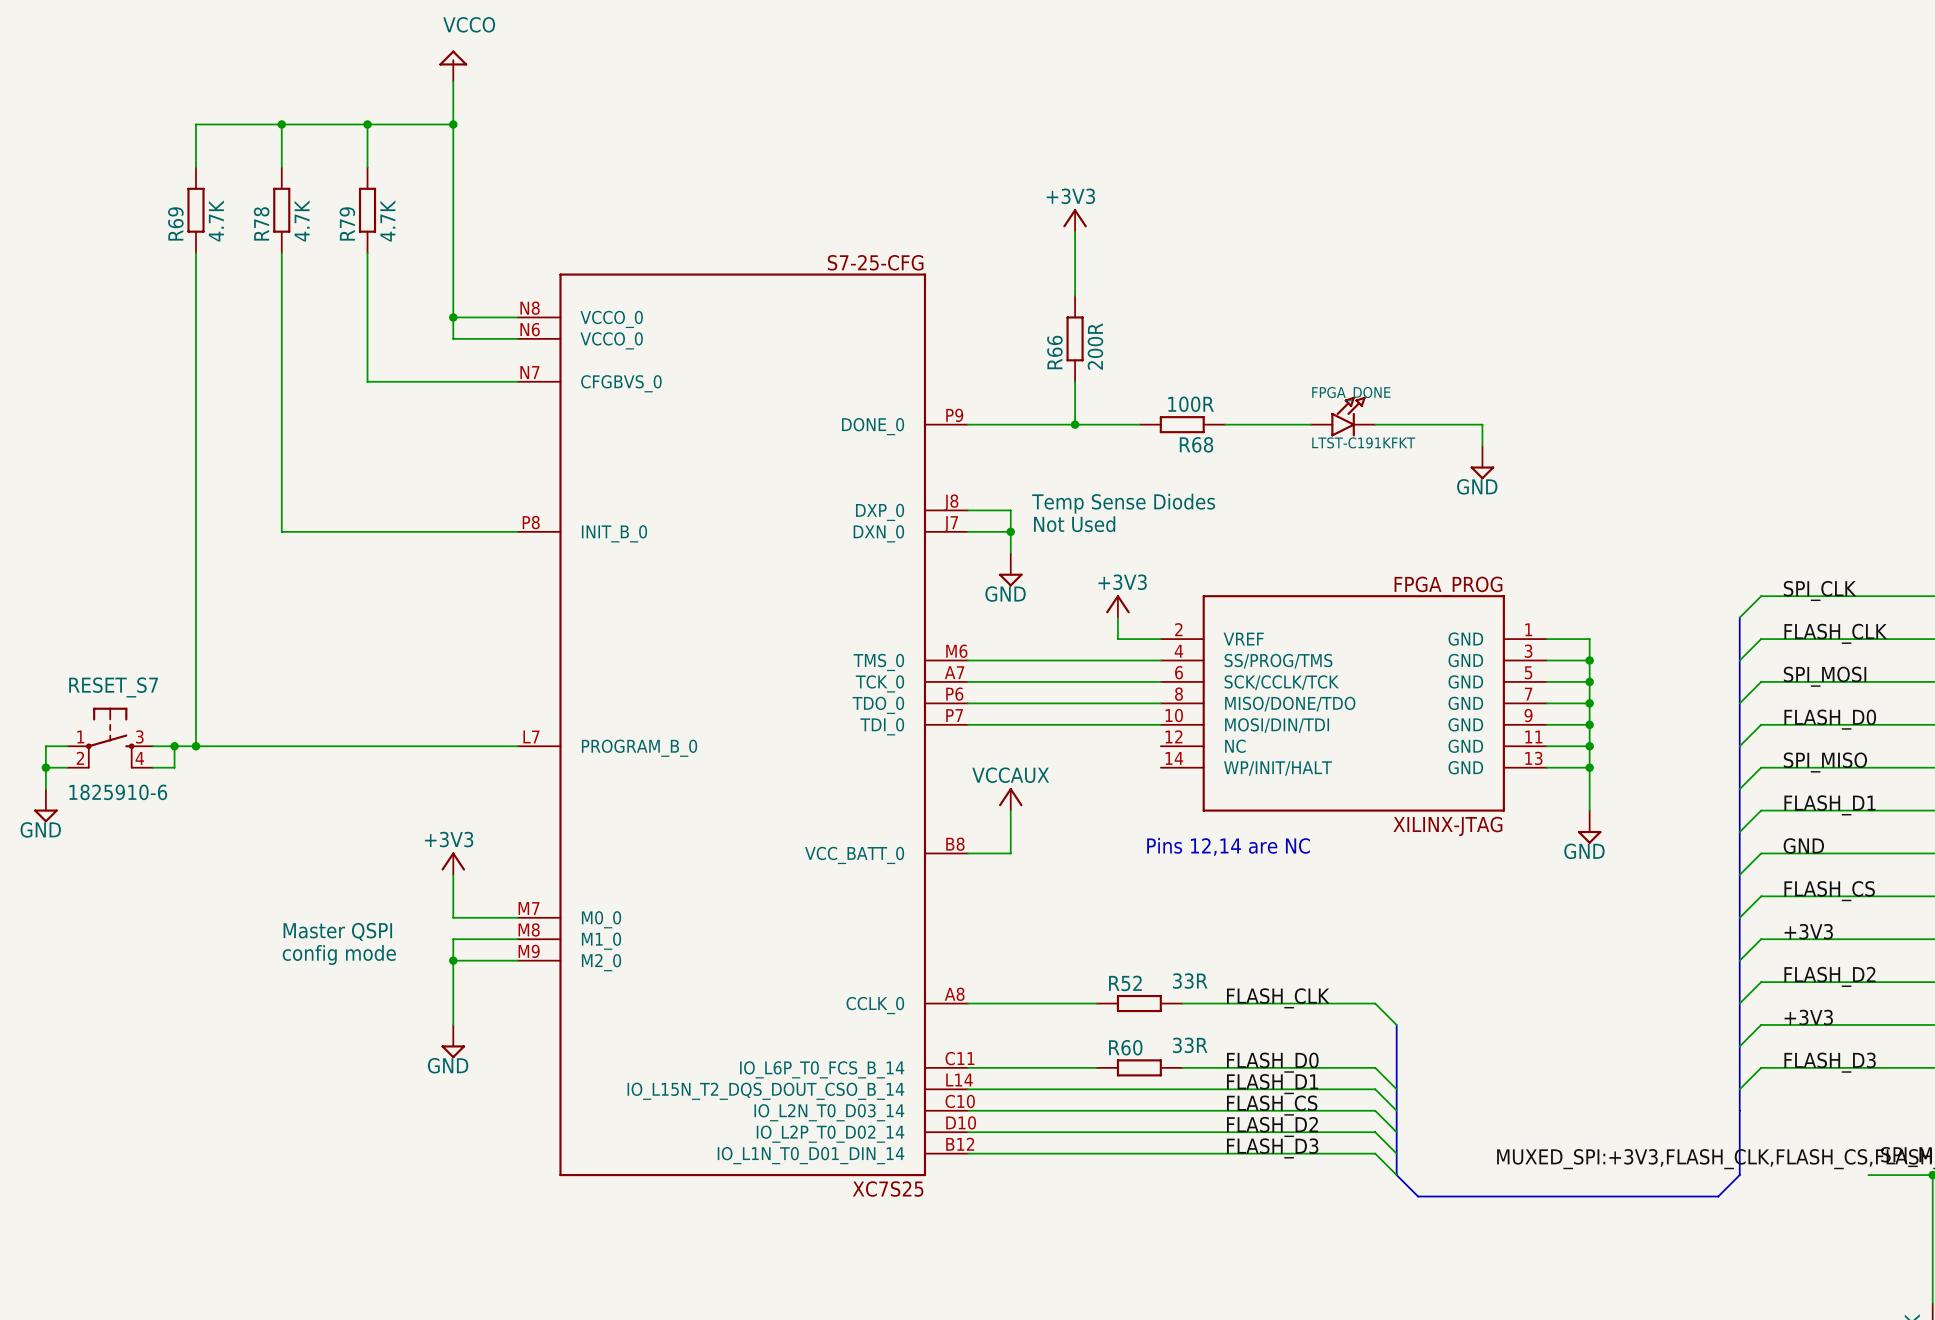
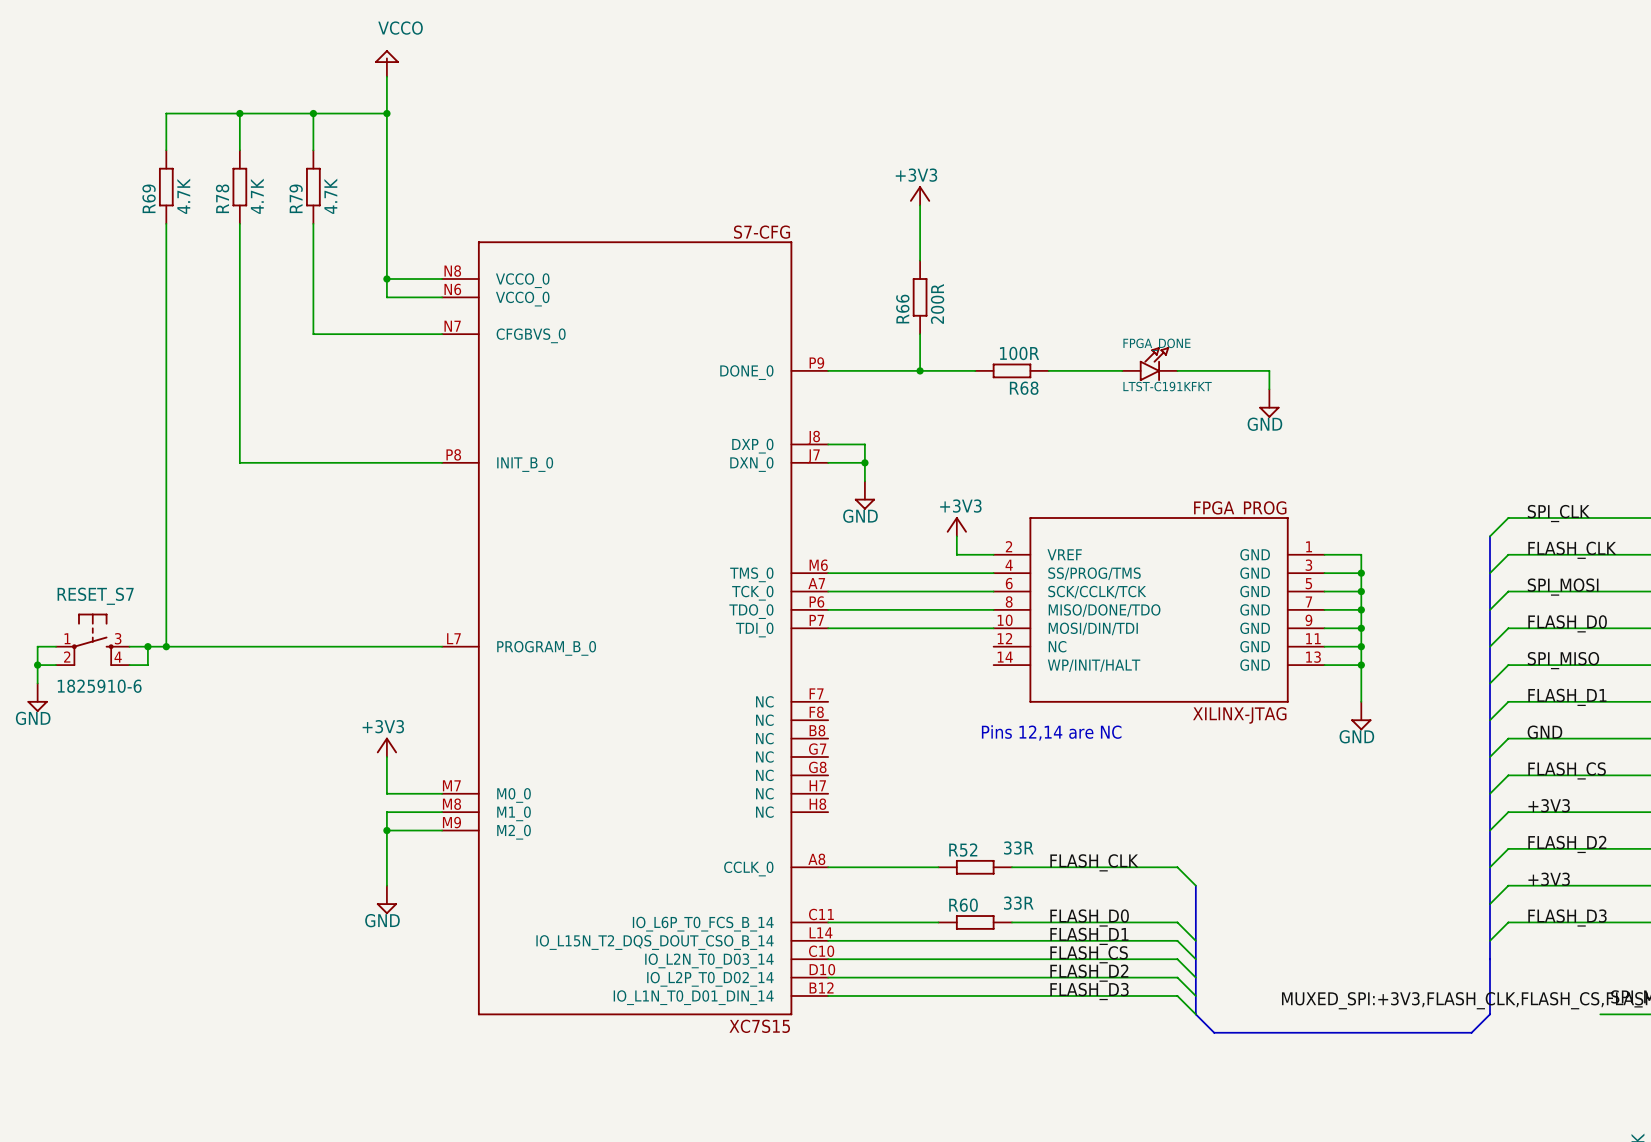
text: Temp Sense Diodes (1123, 503) -> none
text: Not Used (1074, 524) -> none
S7-25-CFG: XC7S25 (742, 724) -> none
S7-CFG: none -> XC7S15 (635, 628)
power symbol: VCCAUX (1010, 799) -> none
wire: (1010, 810) (1010, 853) (967, 853) -> none
text: Master QSPI (337, 931) -> none
text: config mode (339, 954) -> none

